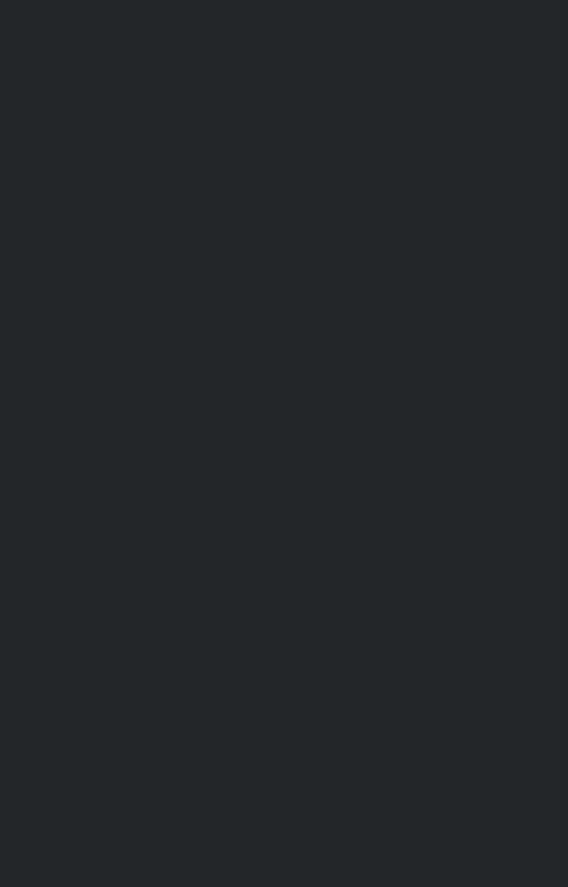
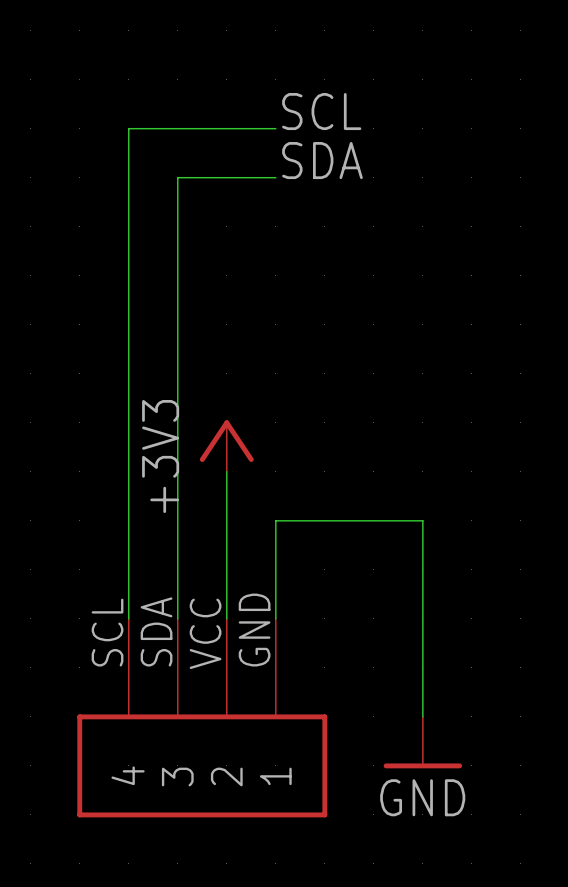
label: none -> SCL (321, 111)
wire: none -> (275, 128) (128, 128) (128, 618)
label: none -> SDA (322, 160)
wire: none -> (275, 177) (177, 177) (177, 618)
power symbol: none -> +3V3 (226, 446)
wire: none -> (226, 471) (226, 618)
wire: none -> (275, 618) (275, 520) (422, 520) (422, 716)
part: none -> (202, 718)
power symbol: none -> GND (422, 742)

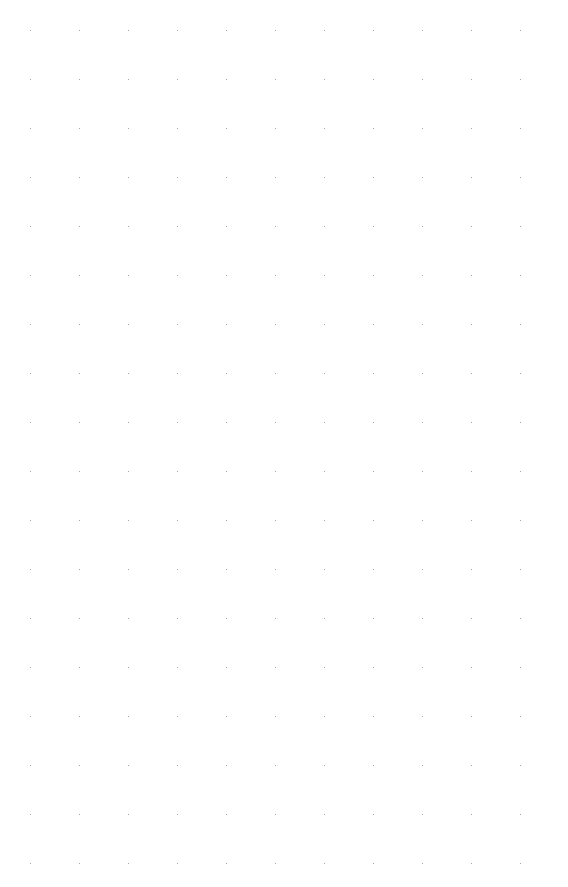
label: SCL (321, 111) -> none
wire: (275, 128) (128, 128) (128, 618) -> none
label: SDA (322, 160) -> none
wire: (275, 177) (177, 177) (177, 618) -> none
power symbol: +3V3 (226, 446) -> none
wire: (226, 471) (226, 618) -> none
wire: (275, 618) (275, 520) (422, 520) (422, 716) -> none
part: (202, 718) -> none
power symbol: GND (422, 742) -> none

